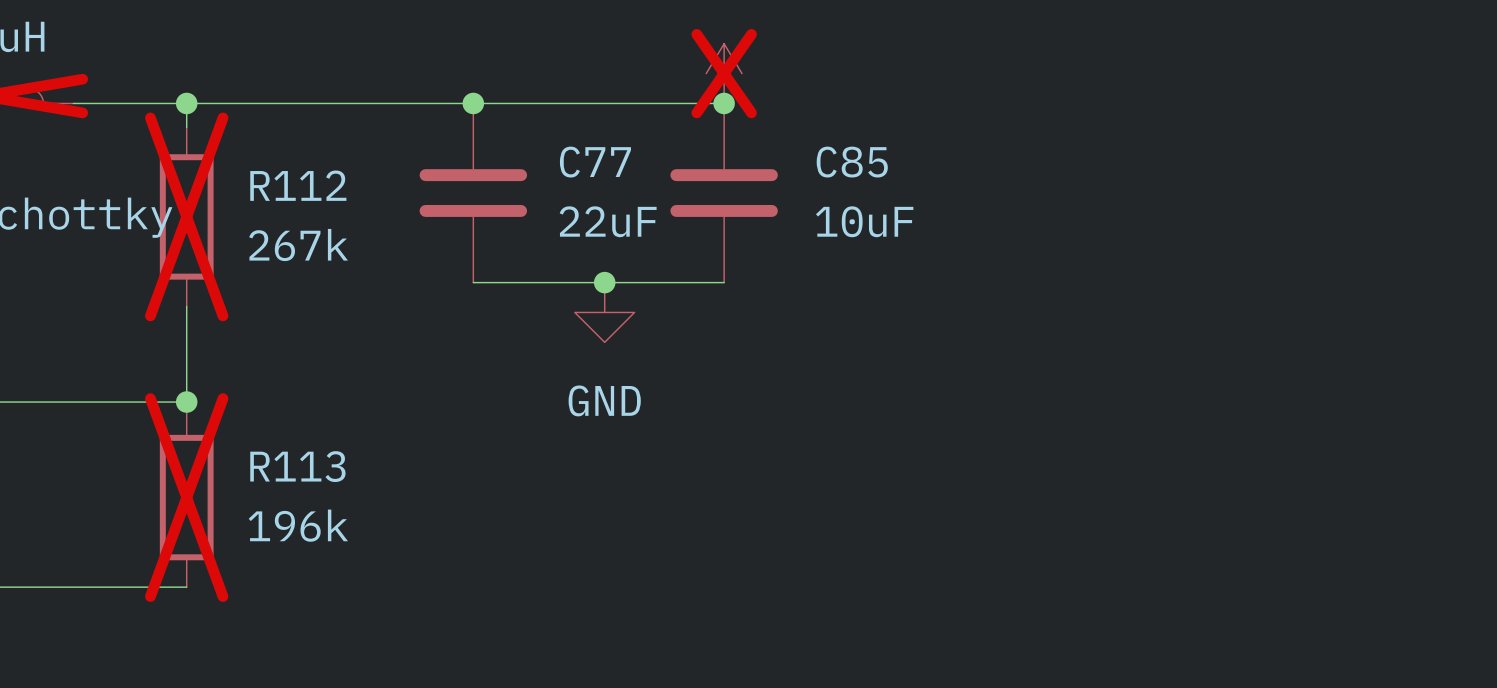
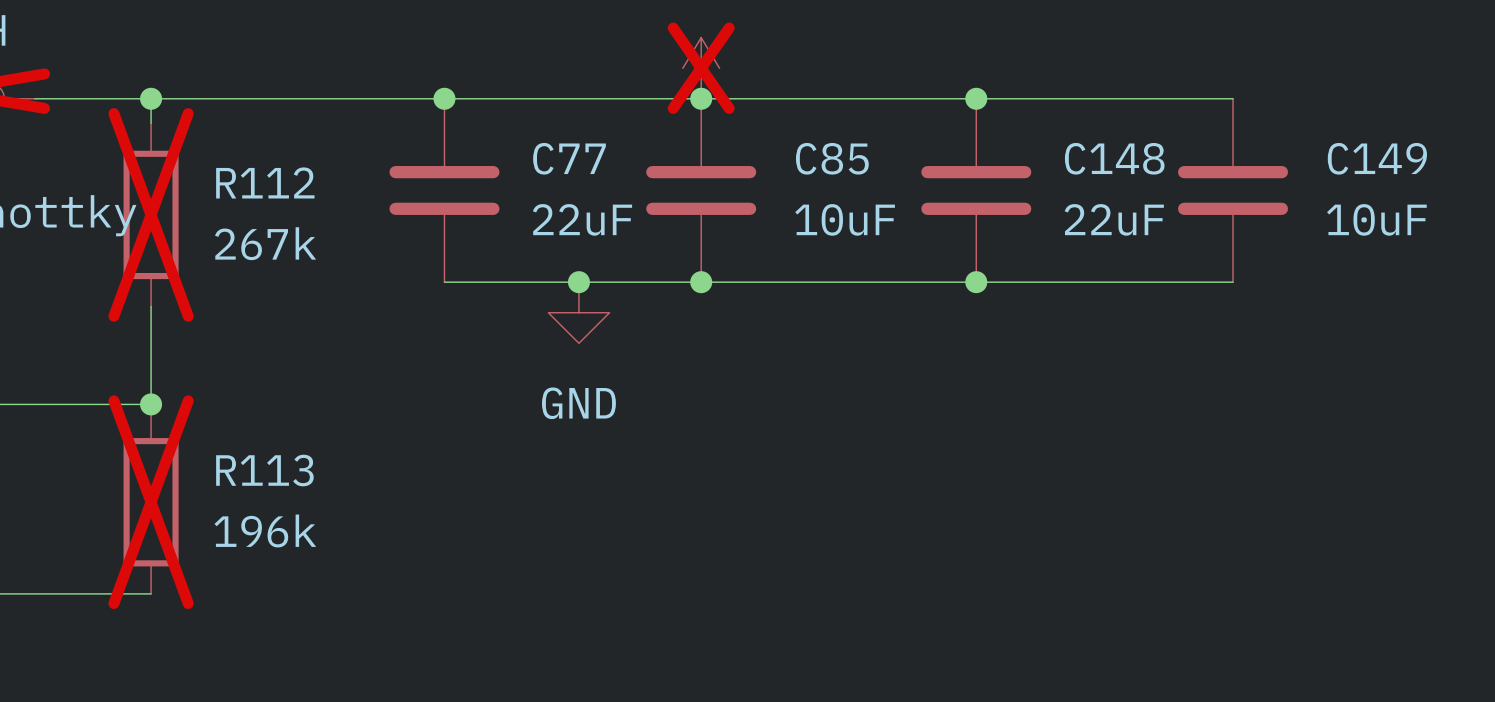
wire: none -> (701, 98) (1233, 98)
junction: none -> (976, 98)
C148: none -> 22uF (976, 190)
C149: none -> 10uF (1233, 190)
wire: none -> (701, 282) (1233, 282)
junction: none -> (701, 282)
junction: none -> (976, 282)

